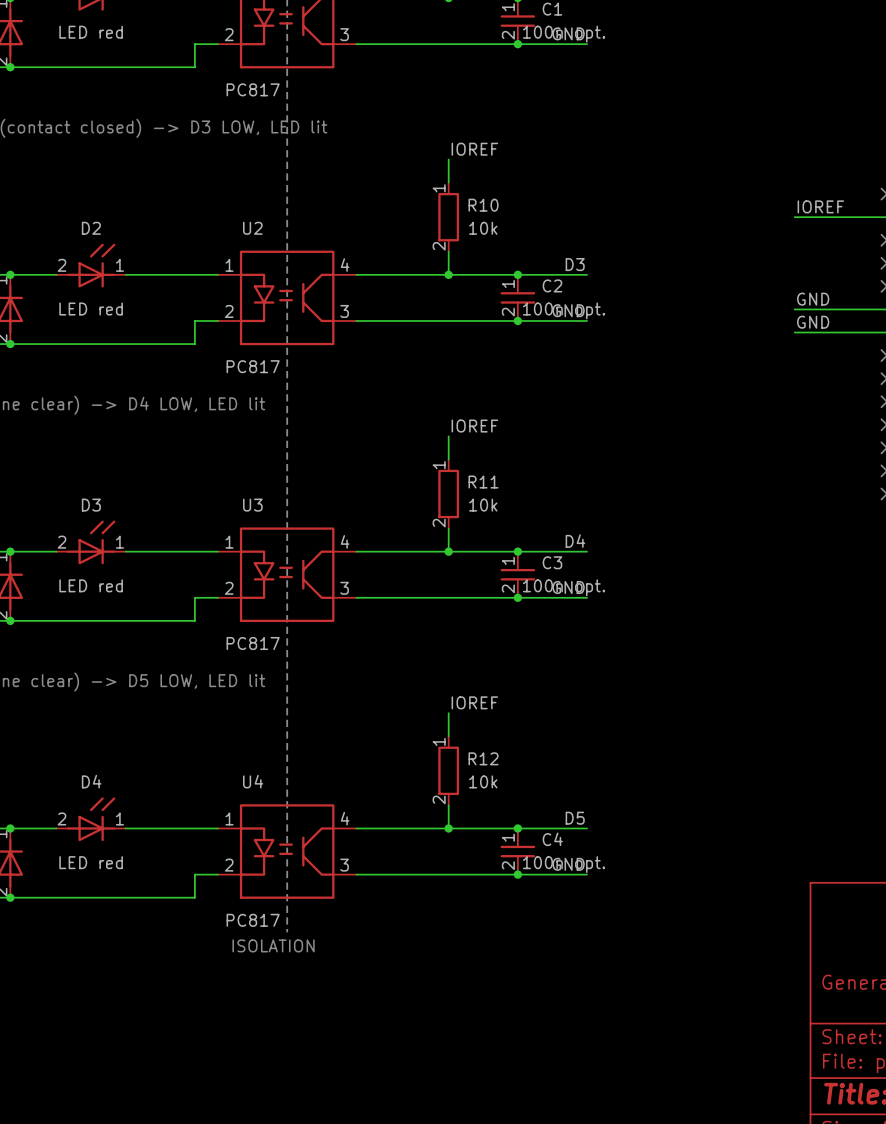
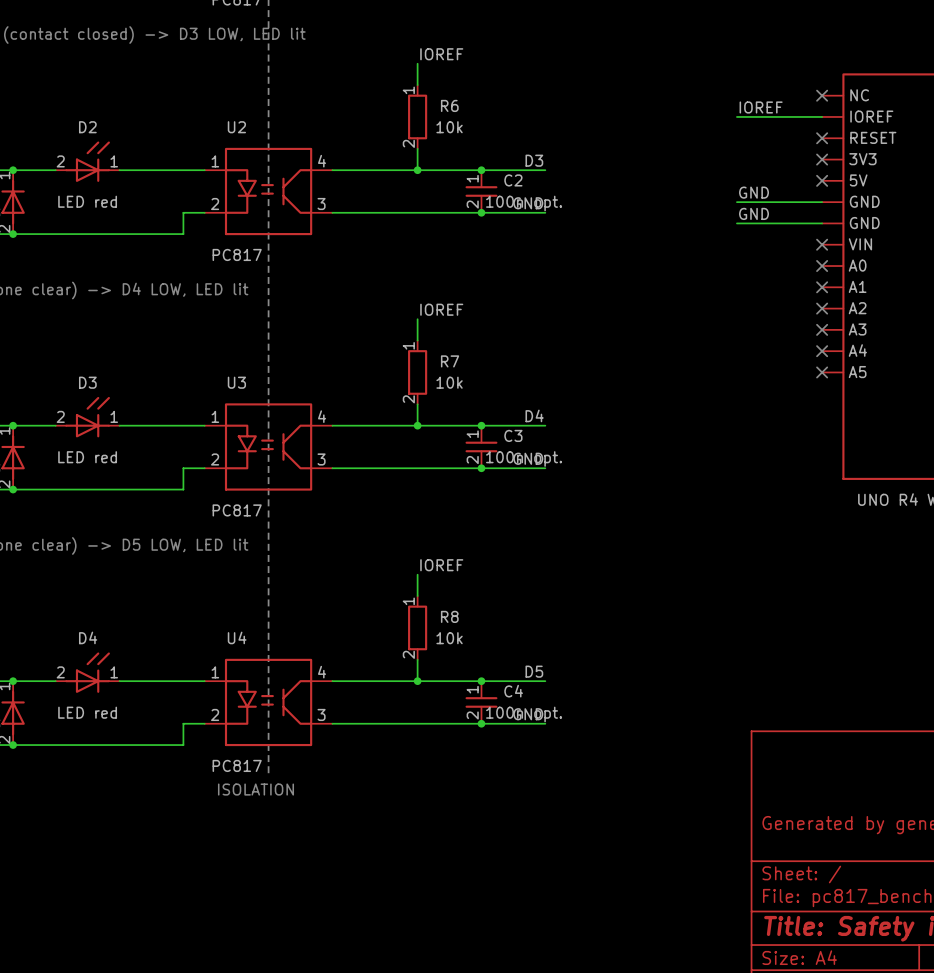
R10 name: R10 (483, 205) -> R6 (449, 105)
R11 name: R11 (483, 482) -> R7 (450, 361)
R12 name: R12 (483, 758) -> R8 (449, 616)

